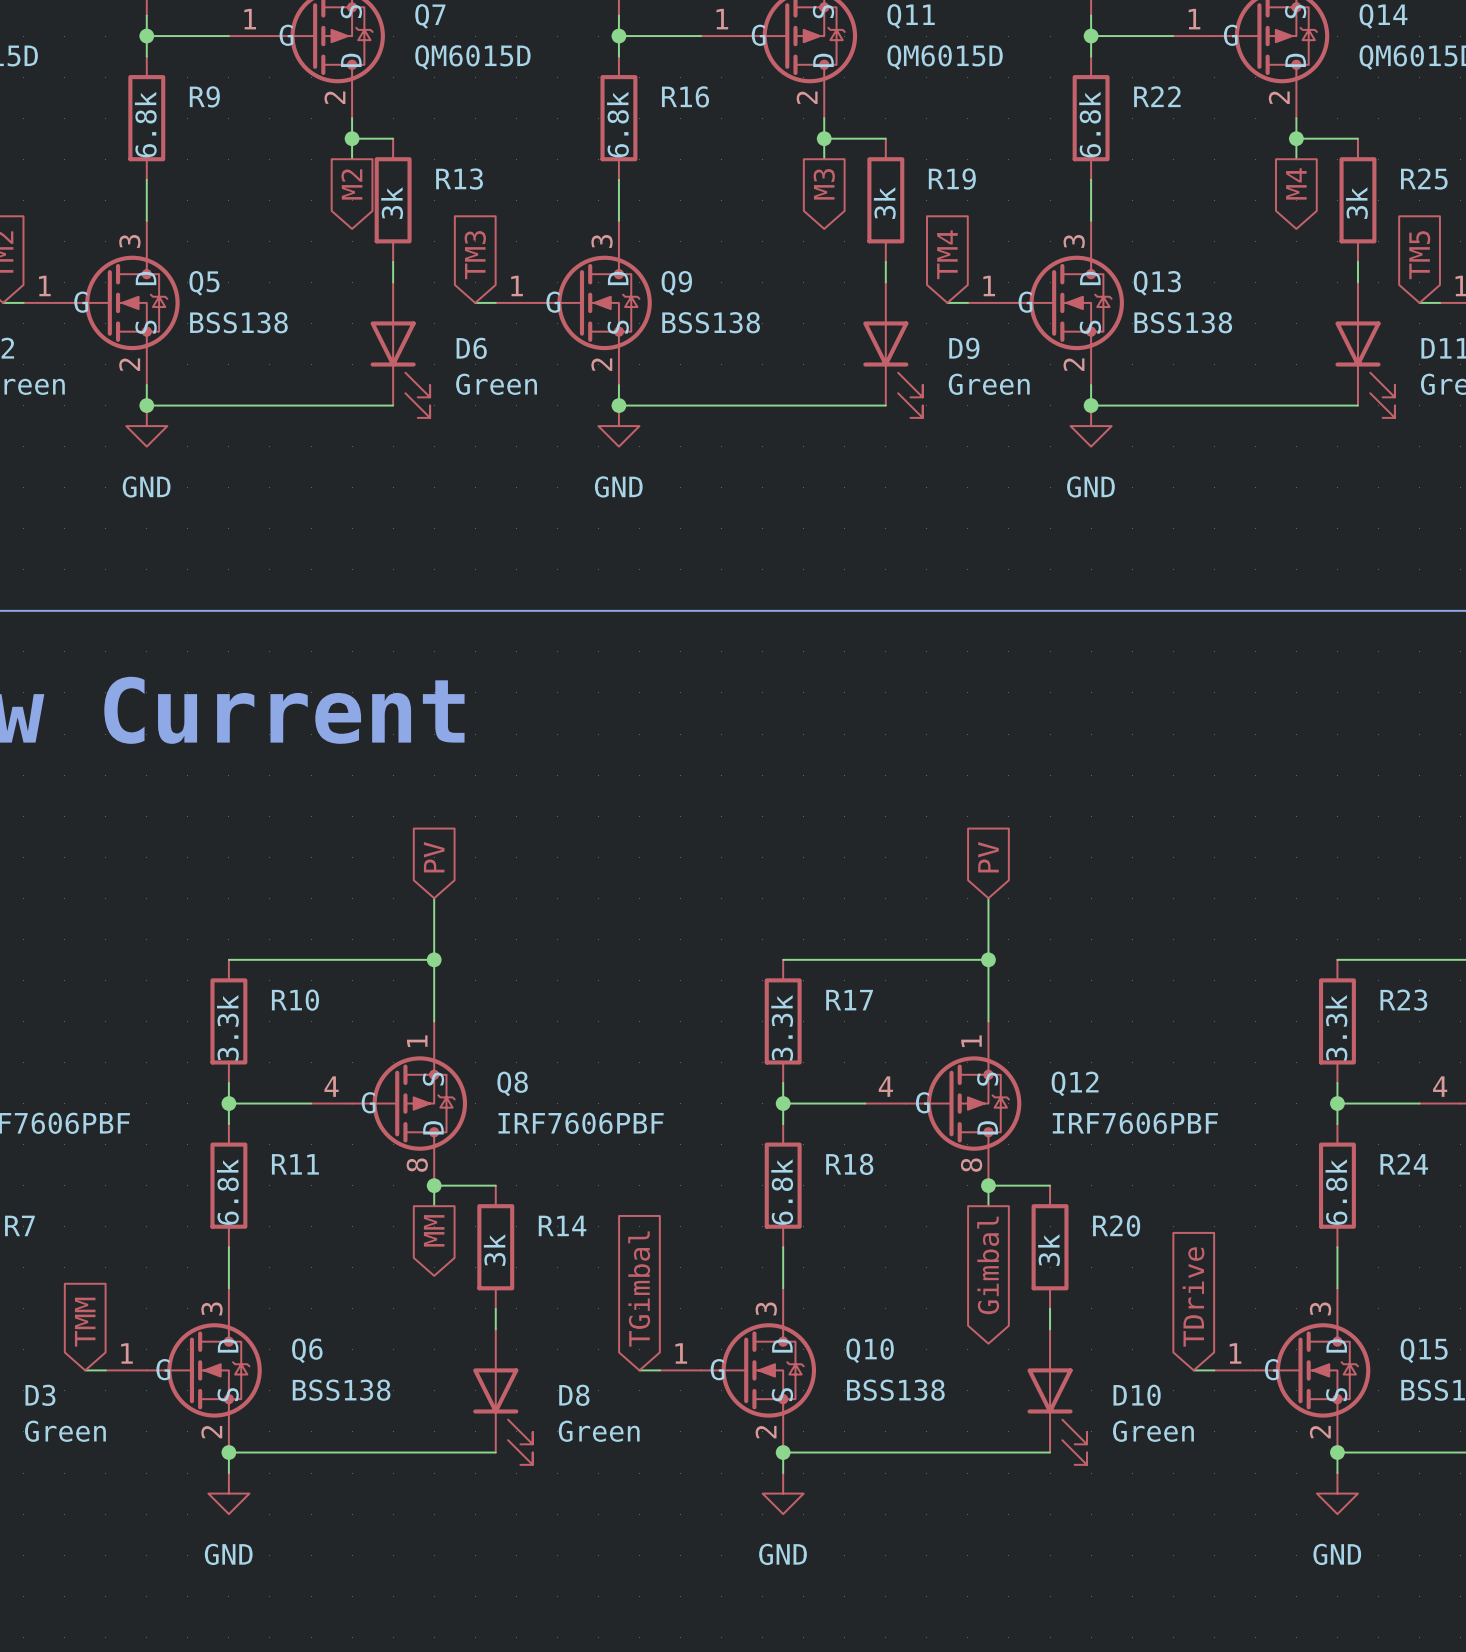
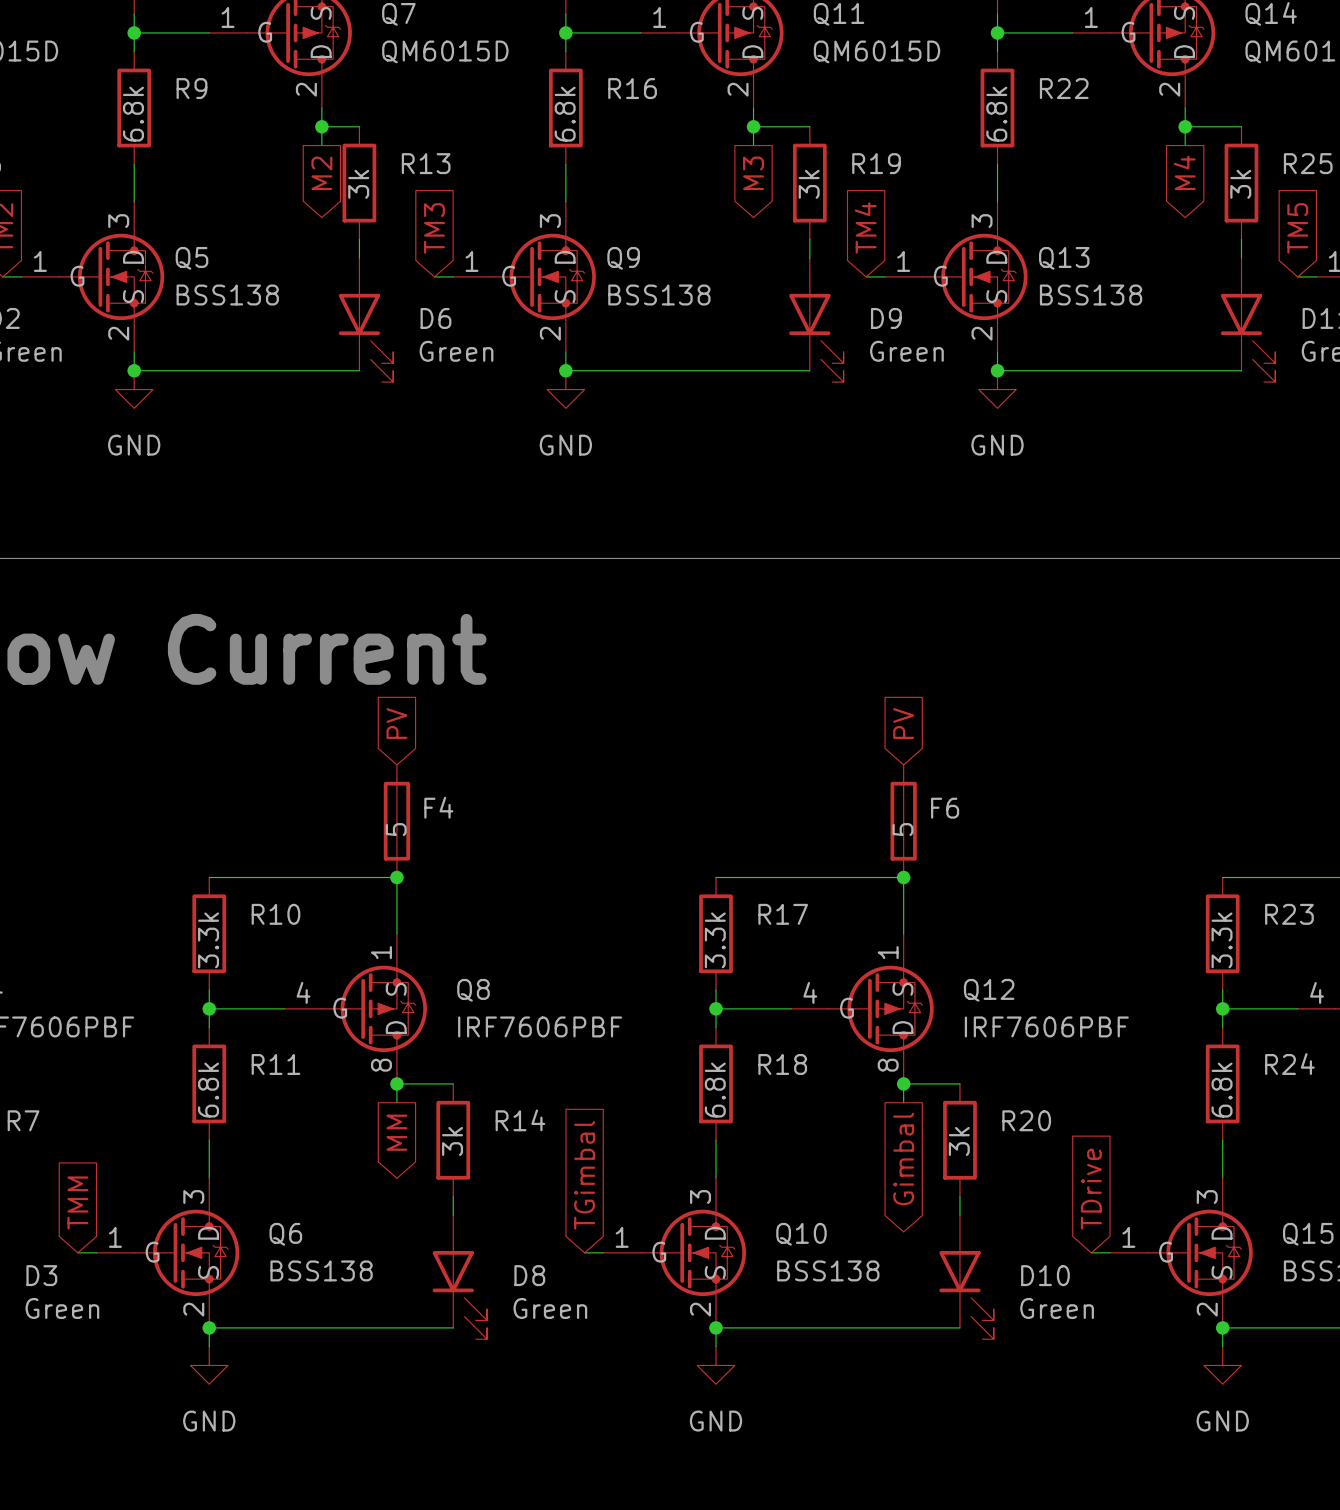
global label position: PV (434, 857) -> PV (396, 723)
global label position: PV (988, 857) -> PV (903, 723)
F4: none -> 5 (396, 821)
F6: none -> 5 (903, 821)

